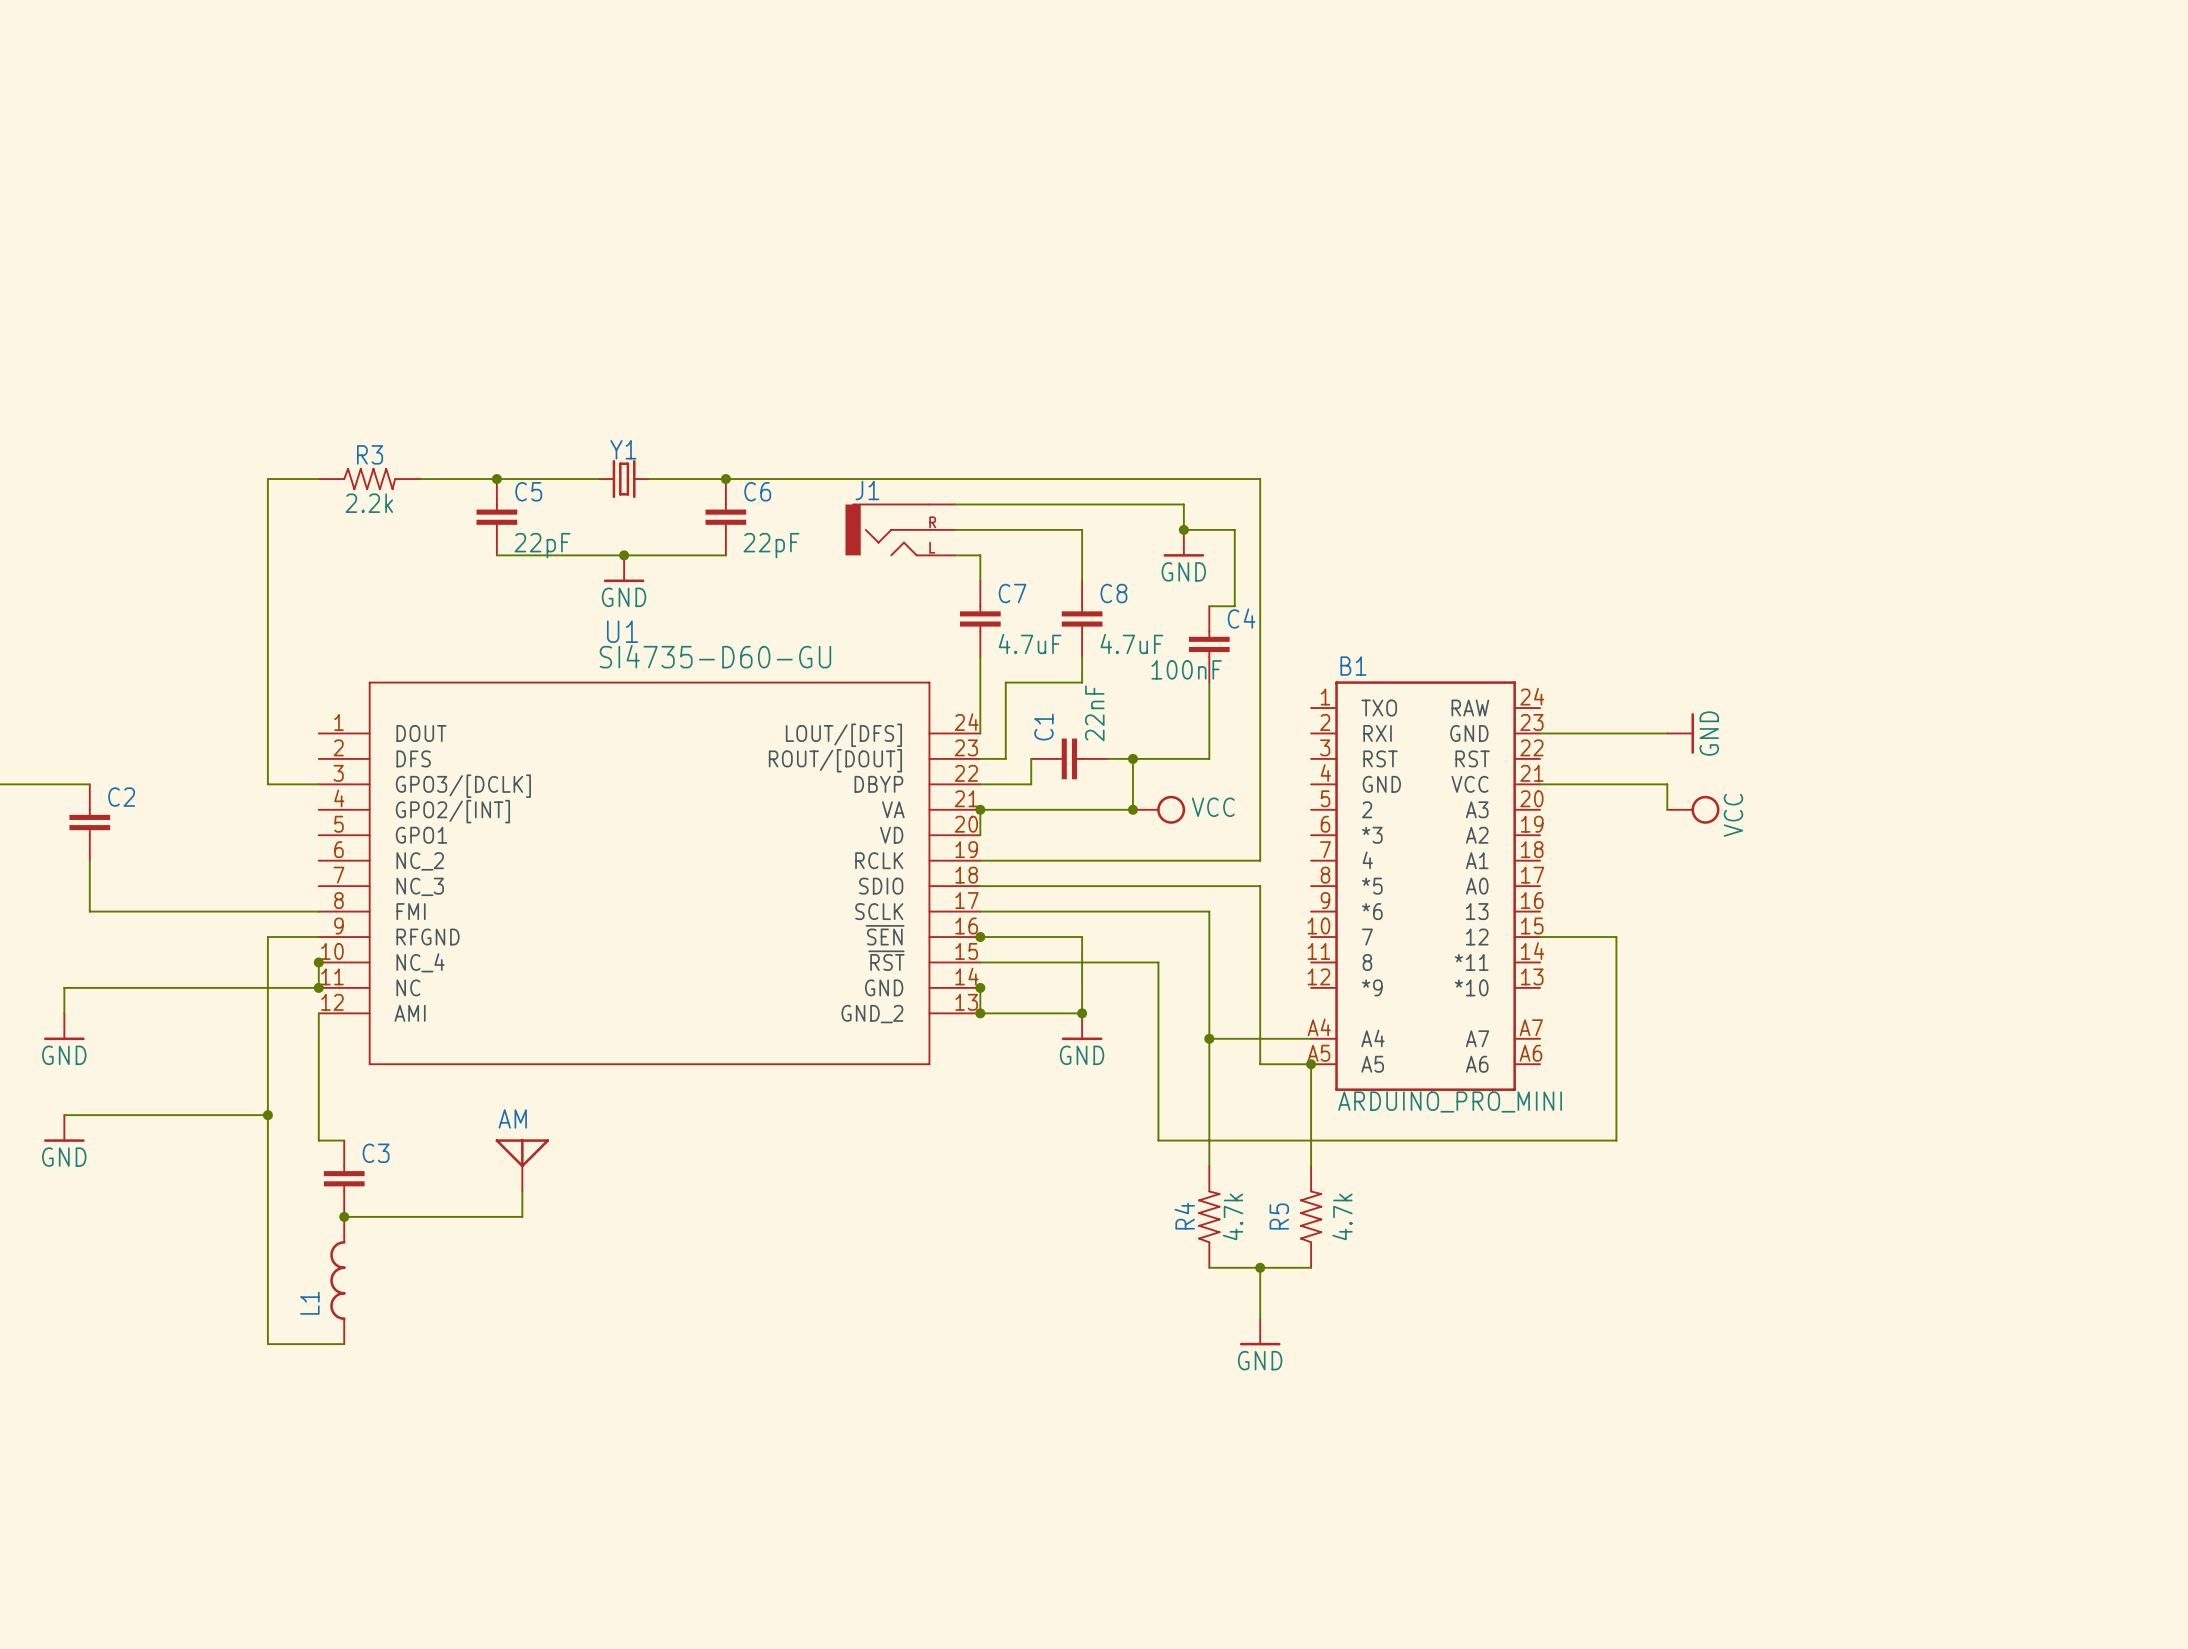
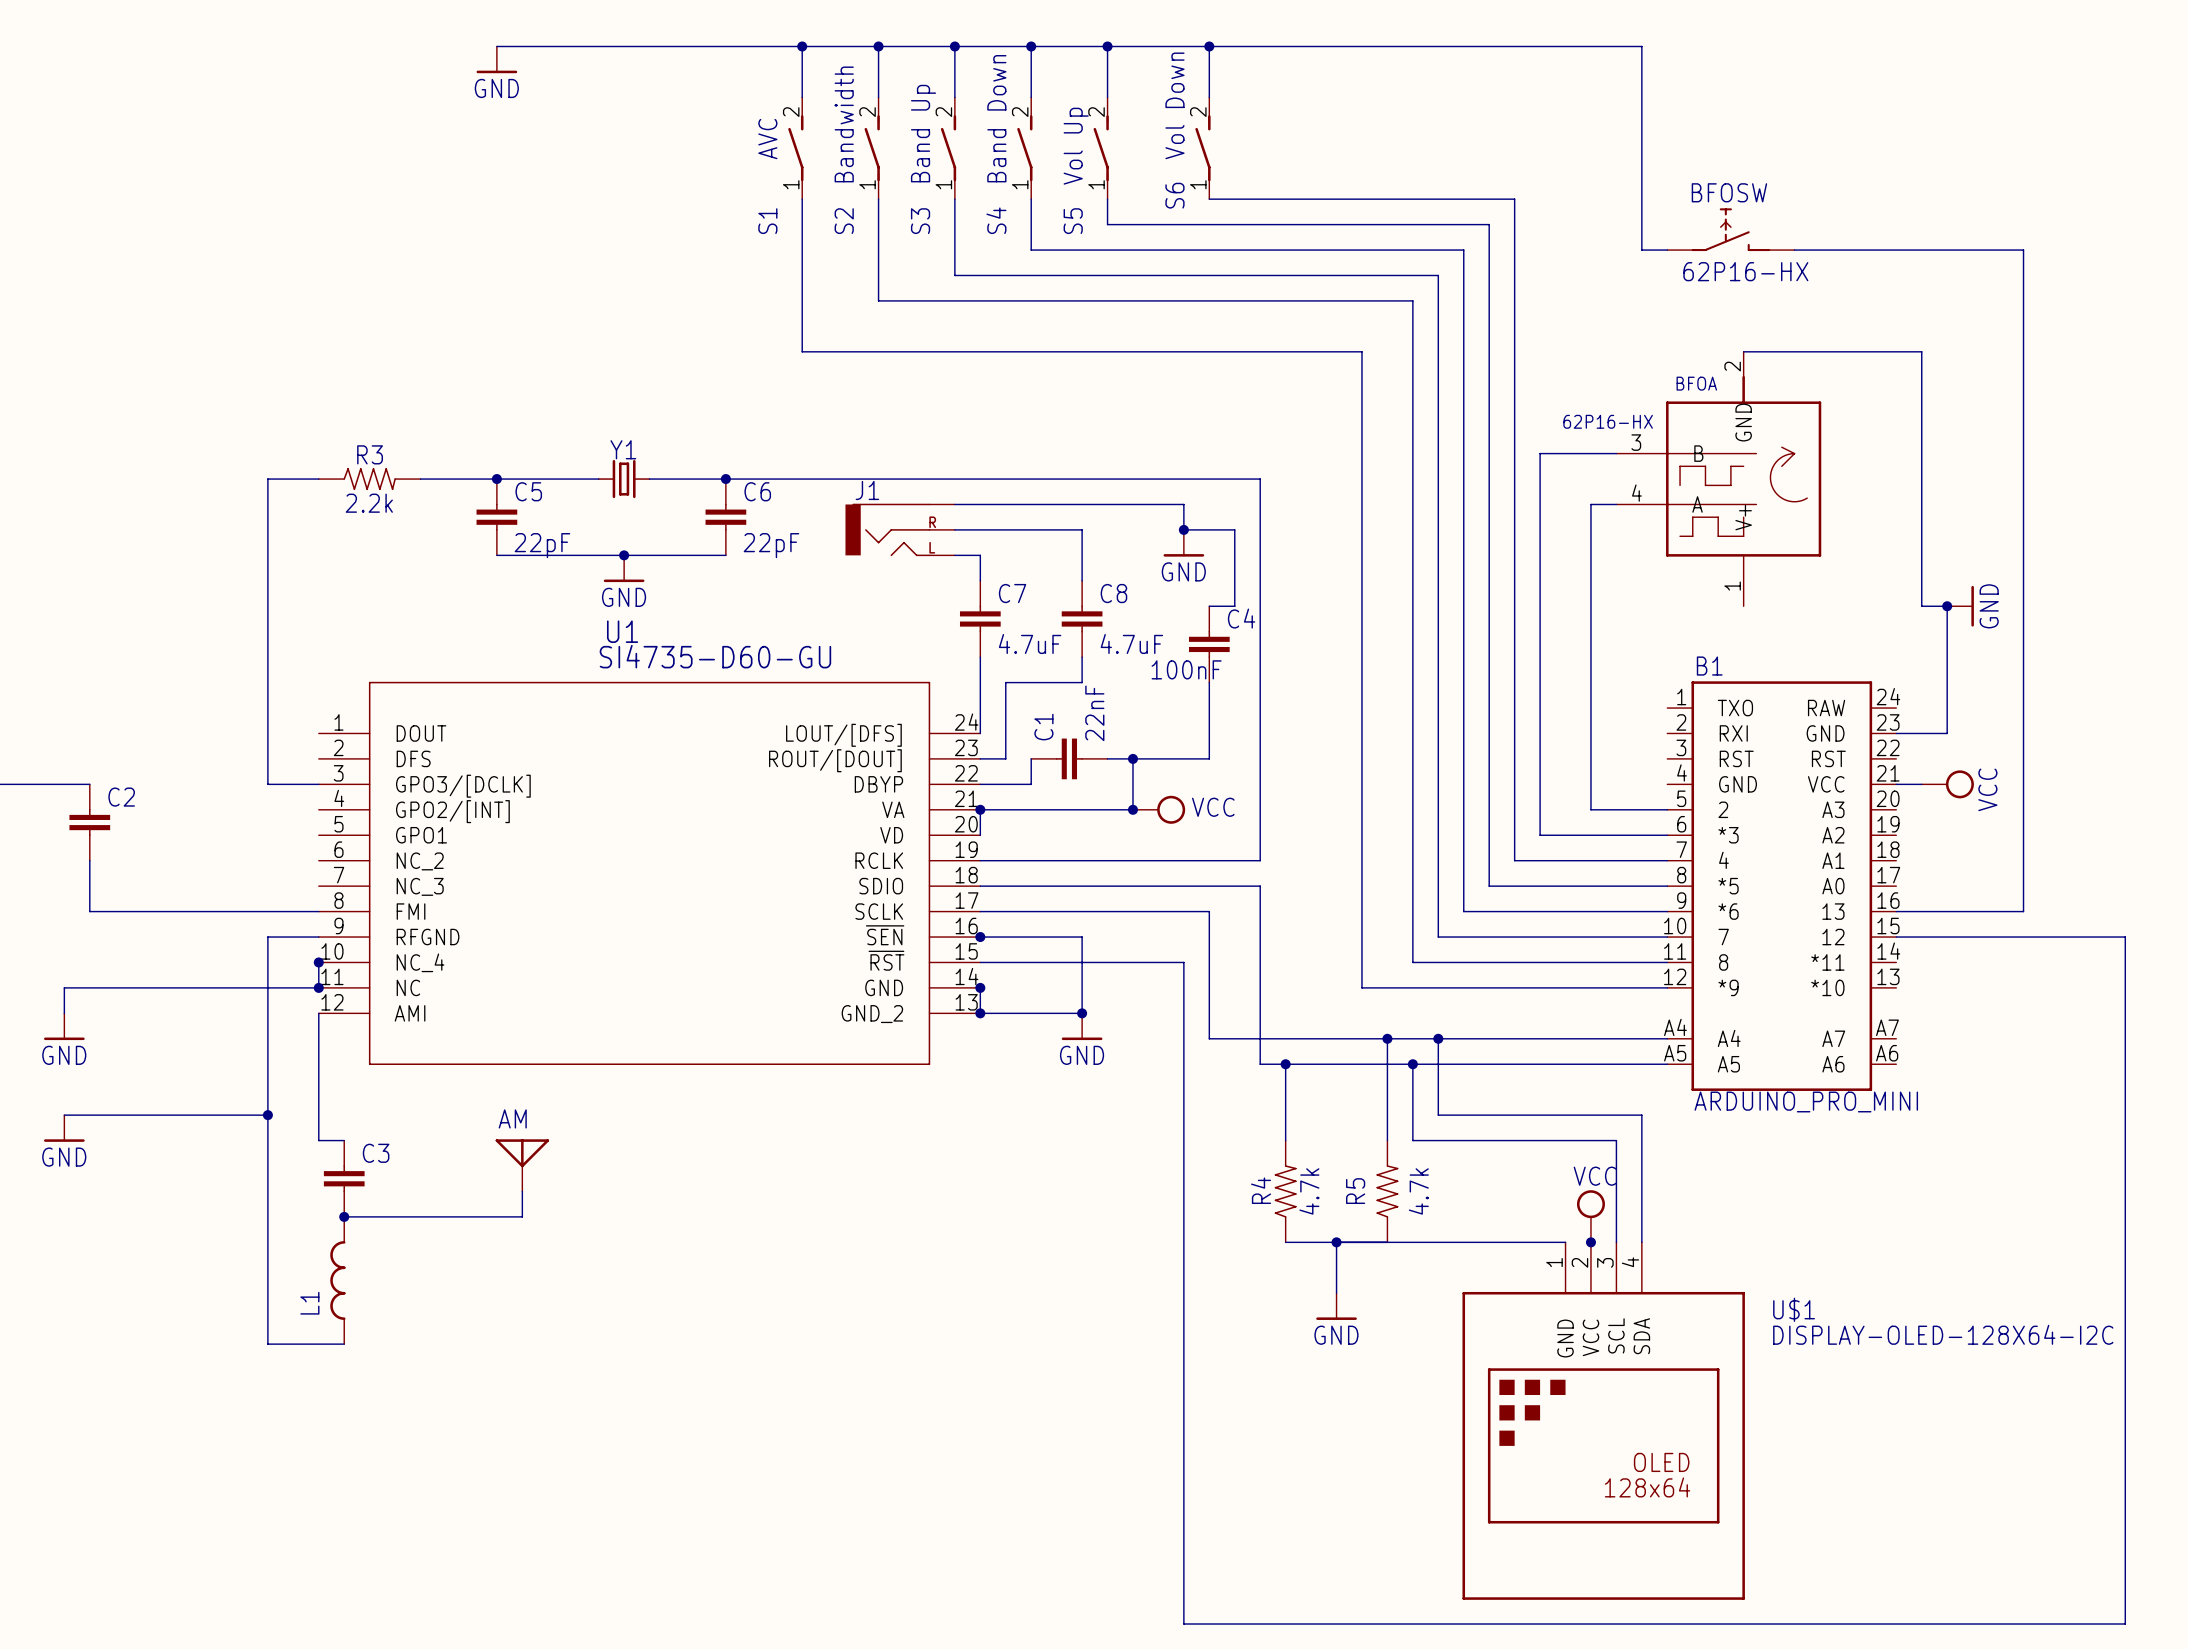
wire: none -> (496, 46) (1641, 46) (1641, 250) (1667, 250)
wire: none -> (802, 46) (802, 97)
junction: none -> (802, 46)
wire: none -> (878, 46) (878, 97)
junction: none -> (878, 46)
wire: none -> (954, 46) (954, 97)
junction: none -> (954, 46)
wire: none -> (1031, 46) (1031, 97)
junction: none -> (1031, 46)
wire: none -> (1107, 46) (1107, 97)
junction: none -> (1107, 46)
wire: none -> (1209, 46) (1209, 97)
junction: none -> (1209, 46)
power symbol: none -> GND (496, 59)
S1: none -> AVC (795, 148)
S2: none -> Bandwidth (872, 148)
S3: none -> Band Up (948, 148)
S4: none -> Band Down (1024, 148)
S5: none -> Vol Up (1101, 148)
S6: none -> Vol Down (1202, 148)
wire: none -> (802, 199) (802, 351) (1361, 351) (1361, 987) (1667, 987)
wire: none -> (878, 199) (878, 300) (1412, 300) (1412, 962) (1667, 962)
wire: none -> (954, 199) (954, 275) (1438, 275) (1438, 937) (1540, 937)
wire: none -> (1031, 199) (1031, 250) (1463, 250) (1463, 911) (1667, 911)
wire: none -> (1107, 199) (1107, 224) (1489, 224) (1489, 886) (1667, 886)
wire: none -> (1209, 199) (1514, 199) (1514, 860) (1667, 860)
BFOSW: none -> 62P16-HX (1730, 229)
wire: none -> (1794, 250) (2023, 250) (2023, 911) (1896, 911)
wire: none -> (1743, 351) (1921, 351) (1921, 606) (1947, 606) (1947, 733) (1896, 733)
wire: none -> (1616, 453) (1540, 453) (1540, 835) (1667, 835)
BFOA: none -> 62P16-HX (1718, 479)
junction: none -> (1947, 606)
power symbol: none -> GND (1960, 606)
wire: (1540, 733) (1667, 733) -> none
power symbol: GND (1680, 733) -> none
wire: (1540, 784) (1667, 784) (1667, 809) -> (1616, 504) (1590, 504) (1590, 809) (1667, 809)
wire: none -> (1896, 784) (1921, 784)
power symbol: none -> VCC (1947, 784)
power symbol: VCC (1693, 809) -> none
B1 position: (1425, 886) -> (1781, 886)
wire: (1616, 937) (1616, 1140) -> (1616, 937) (1667, 937)
wire: none -> (1896, 937) (2125, 937) (2125, 1624) (1183, 1624) (1183, 962) (1158, 962)
wire: (1158, 962) (1158, 1140) (1412, 1140) -> (1412, 1064) (1412, 1140)
wire: (1209, 1038) (1209, 1166) -> none
junction: (1209, 1038) -> none
wire: none -> (1311, 1038) (1667, 1038)
wire: none -> (1387, 1038) (1387, 1140)
junction: none -> (1387, 1038)
wire: none -> (1438, 1038) (1438, 1115) (1641, 1115) (1641, 1242)
junction: none -> (1438, 1038)
wire: none -> (1285, 1064) (1285, 1140)
wire: (1311, 1064) (1311, 1166) -> (1311, 1064) (1667, 1064)
junction position: (1311, 1064) -> (1285, 1064)
junction: none -> (1412, 1064)
wire: none -> (1616, 1140) (1616, 1242)
R4 position: (1209, 1216) -> (1285, 1191)
R5 position: (1311, 1216) -> (1387, 1191)
power symbol: none -> VCC (1590, 1216)
wire: none -> (1285, 1242) (1565, 1242)
junction: none -> (1336, 1242)
junction: none -> (1590, 1242)
wire: (1209, 1267) (1311, 1267) -> none
wire: (1260, 1267) (1260, 1318) -> (1336, 1242) (1336, 1293)
junction: (1260, 1267) -> none
power symbol position: GND (1260, 1332) -> GND (1336, 1306)
U$1: none -> DISPLAY-OLED-128X64-I2C (1603, 1421)

